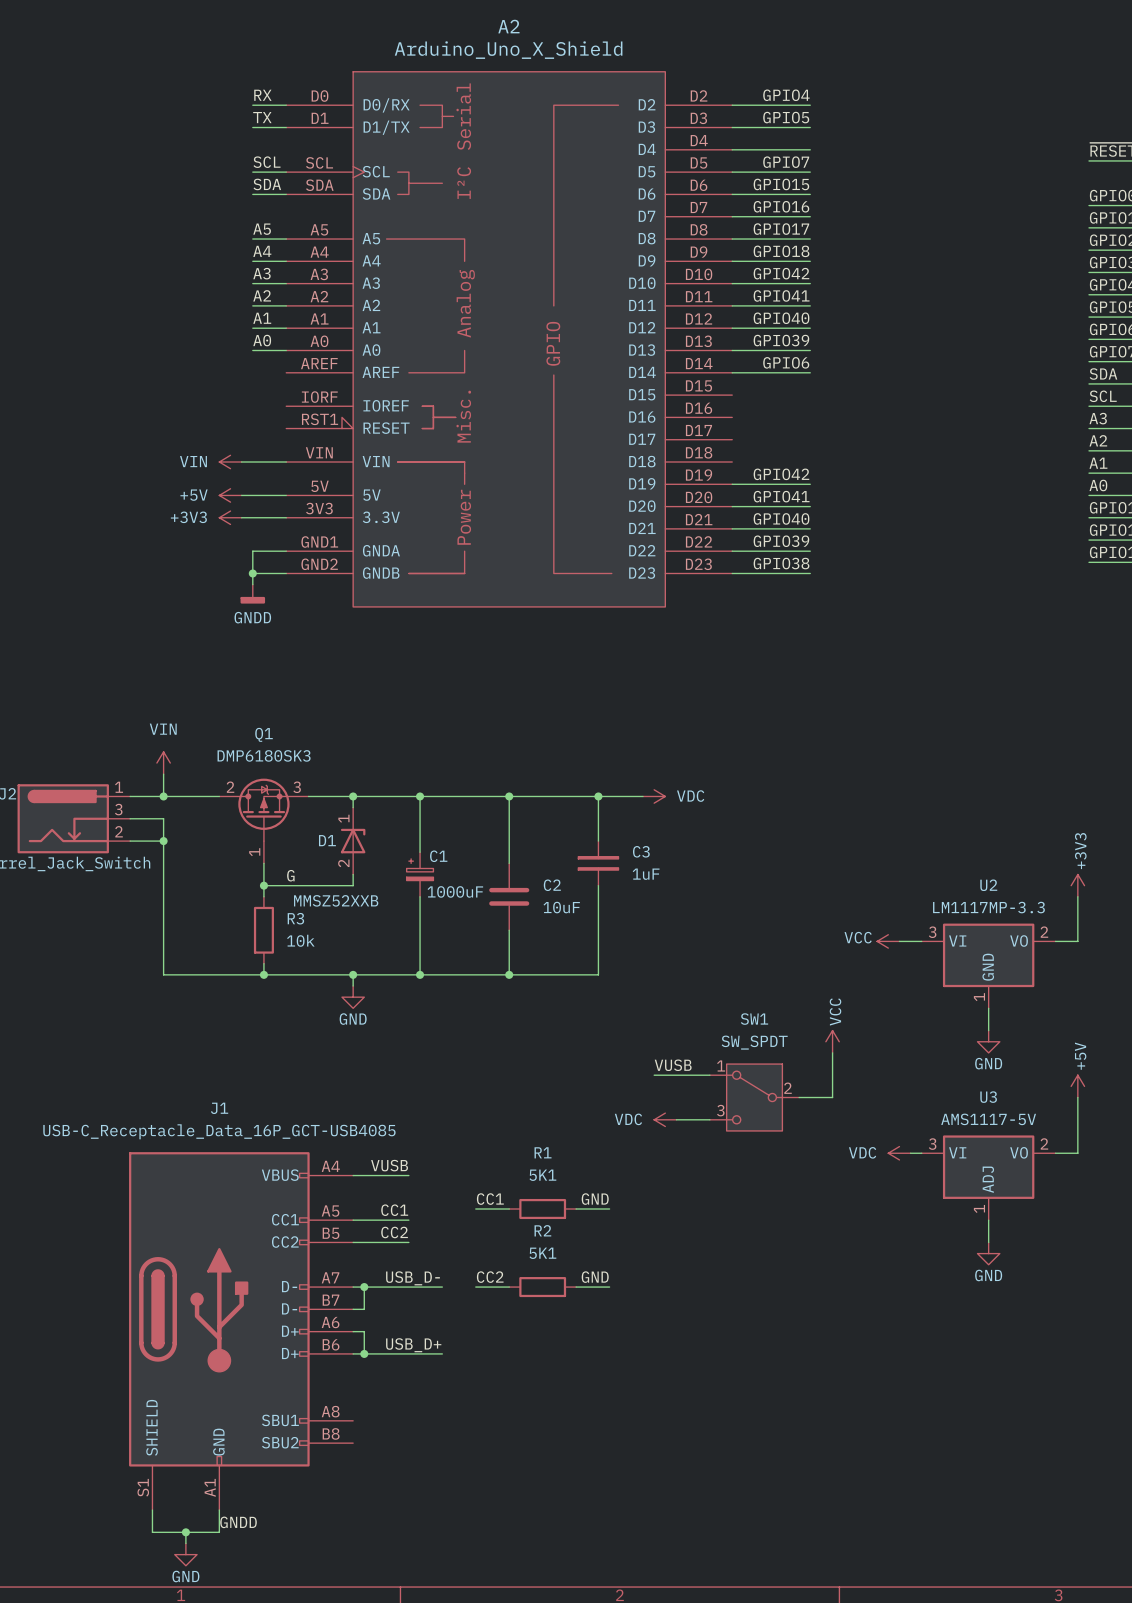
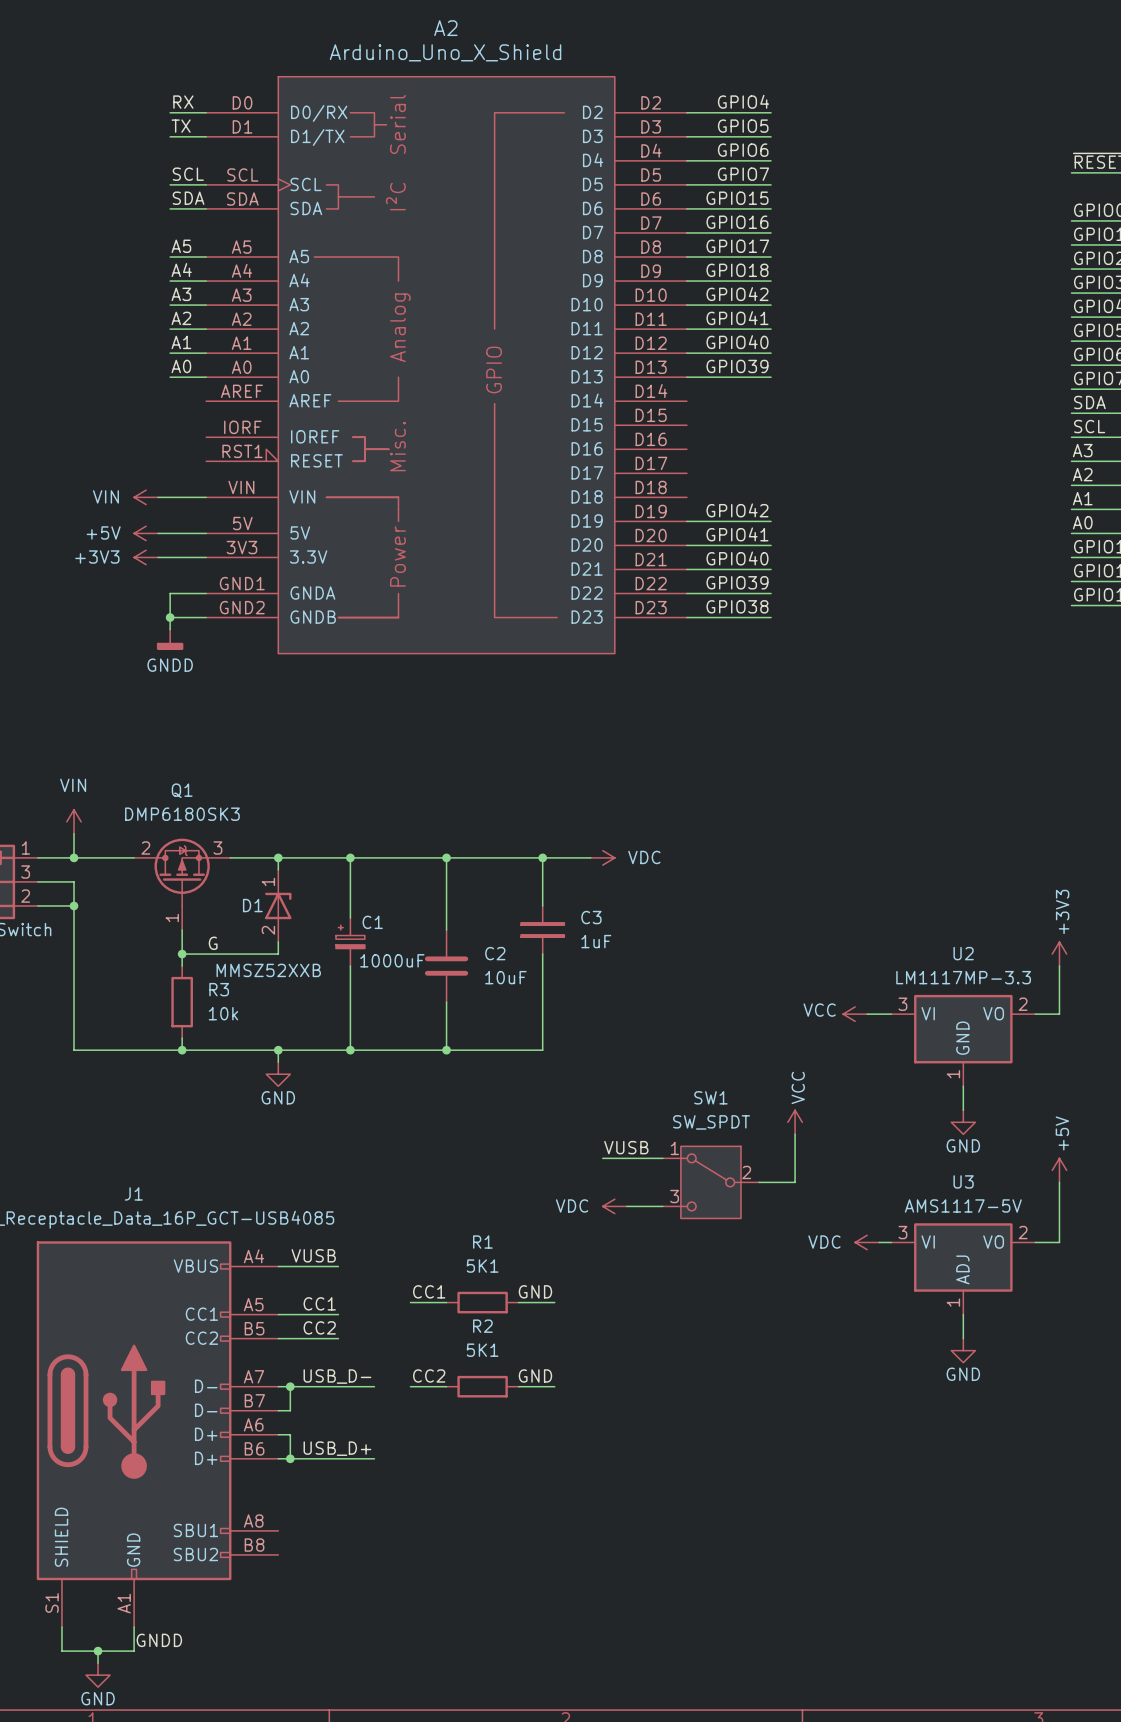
label: none -> GPIO6 (743, 150)
label: GPIO6 (786, 362) -> none
wire: (732, 372) (810, 372) -> none

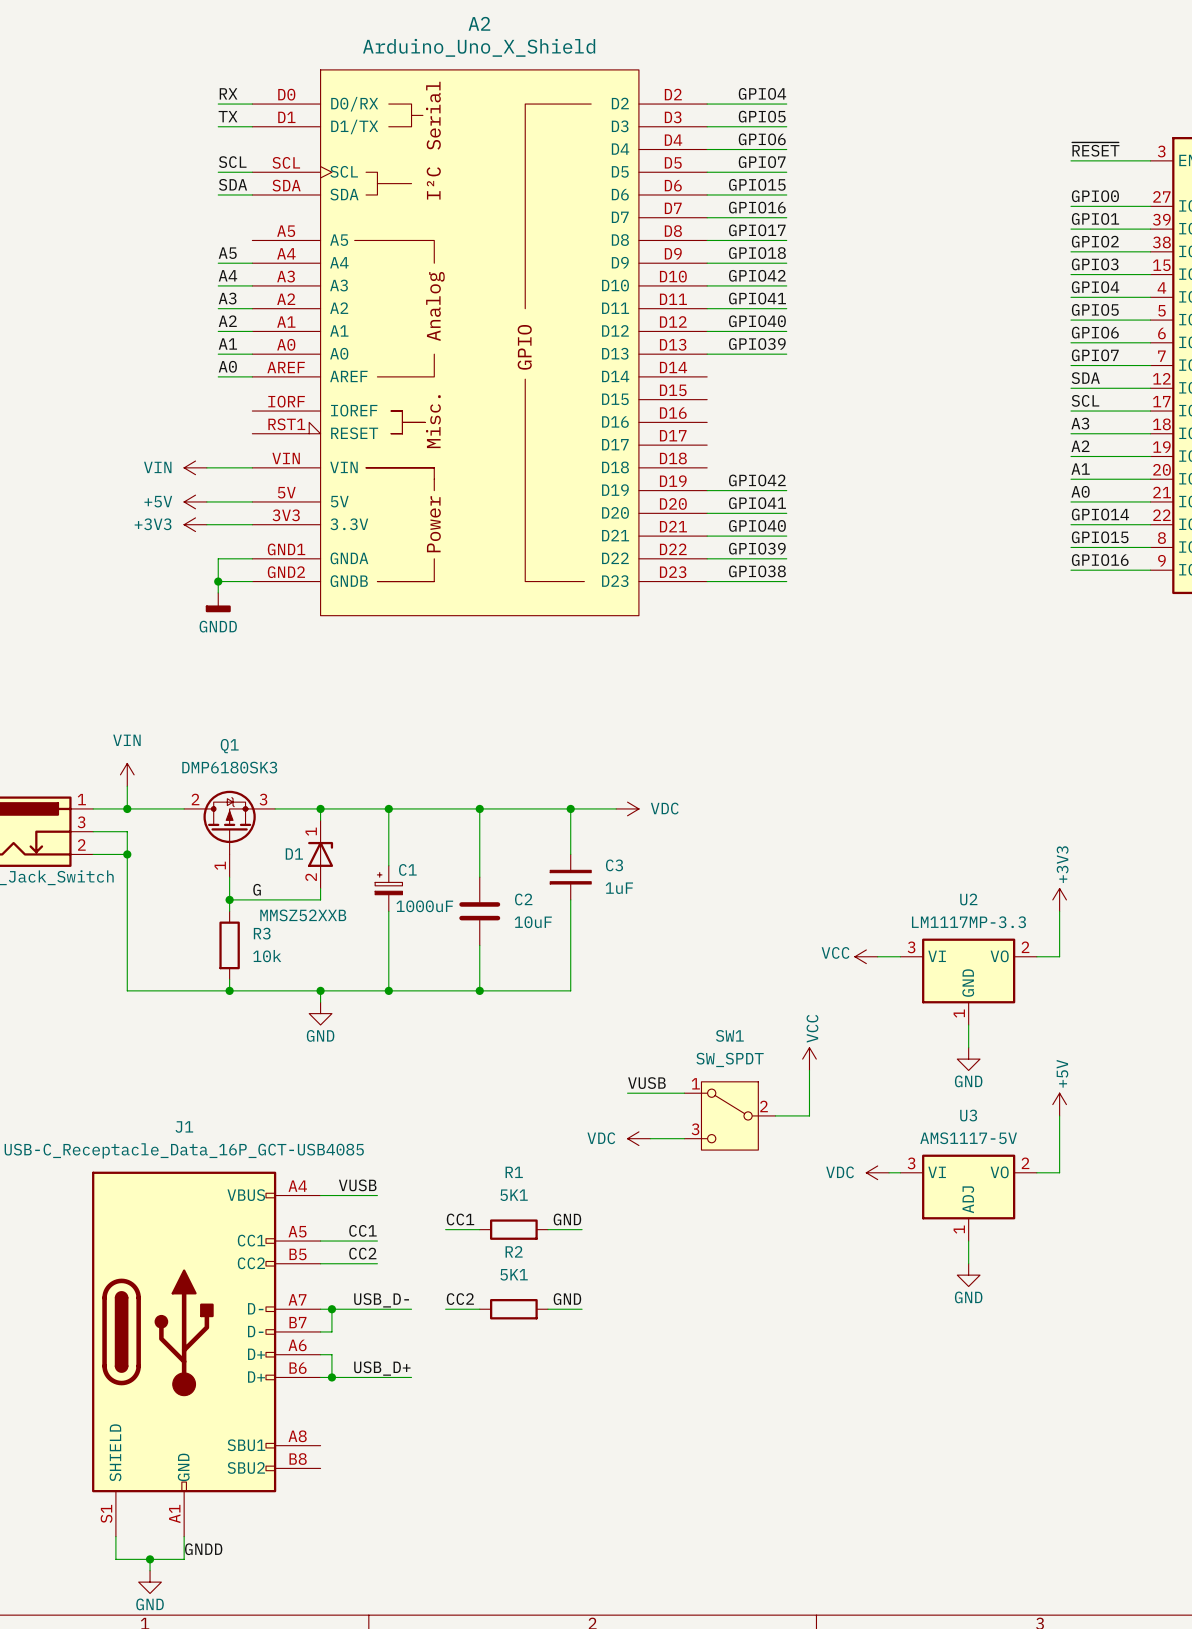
label: A5 (181, 246) -> none
wire: (170, 257) (206, 257) -> (218, 376) (252, 376)
label: A4 (181, 270) -> A5 (227, 253)
label: A3 (181, 294) -> A4 (227, 275)
label: A2 (181, 318) -> A3 (227, 298)
label: A1 (181, 342) -> A2 (227, 321)
label: A0 (181, 366) -> A1 (227, 344)
label: none -> A0 (227, 366)

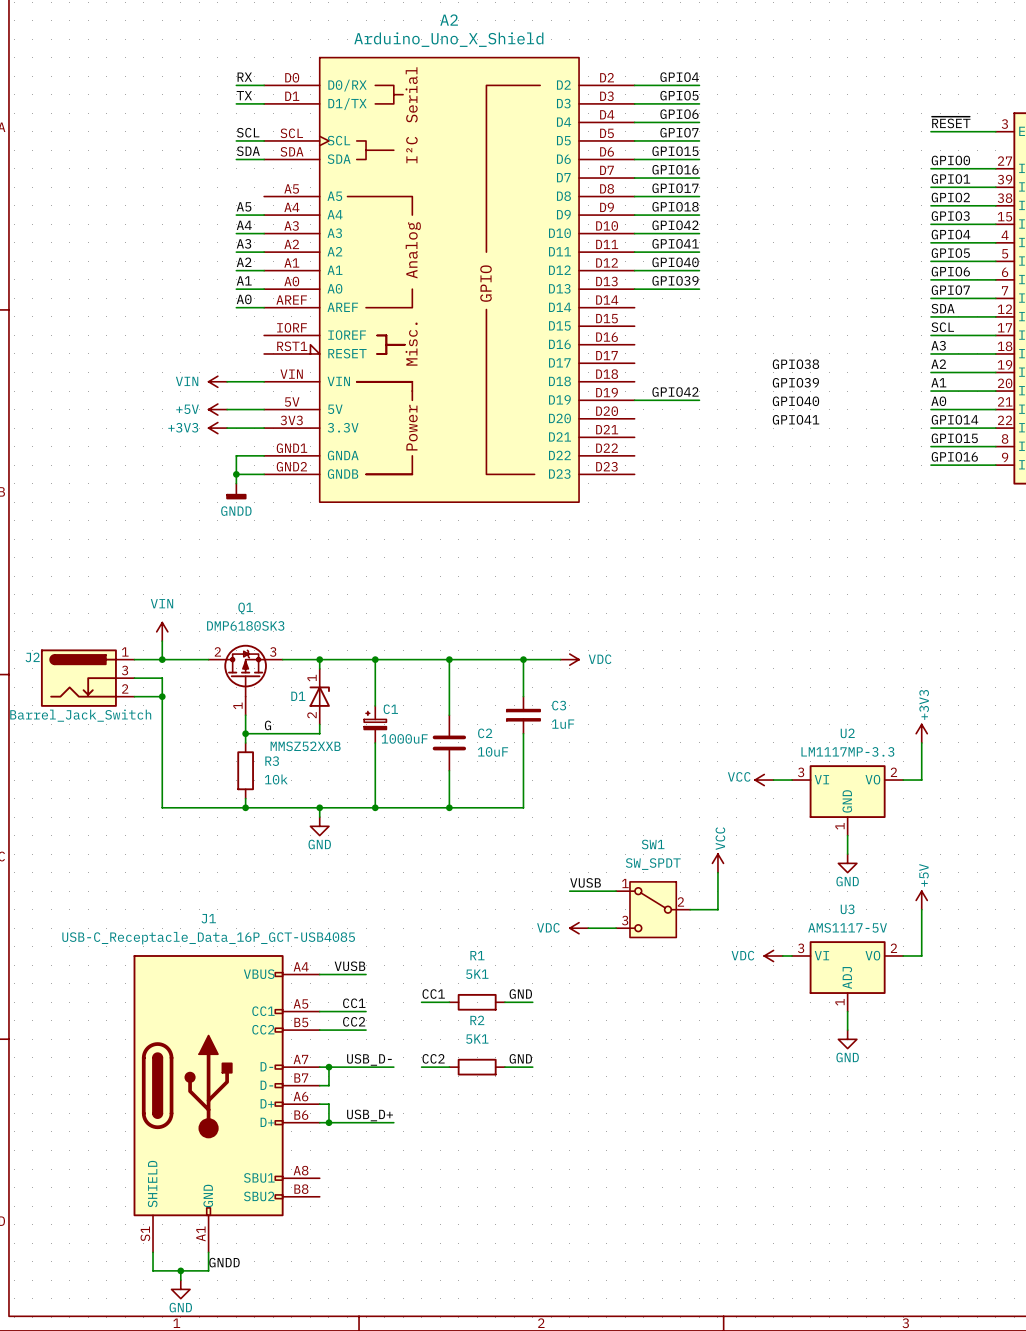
label position: GPIO41 (757, 503) -> GPIO41 (796, 419)
wire: (707, 513) (786, 513) -> none
label position: GPIO40 (757, 525) -> GPIO40 (795, 401)
wire: (707, 536) (786, 536) -> none
label position: GPIO39 (757, 548) -> GPIO39 (795, 382)
wire: (707, 558) (786, 558) -> none
label position: GPIO38 (757, 571) -> GPIO38 (795, 364)
wire: (707, 581) (786, 581) -> none

